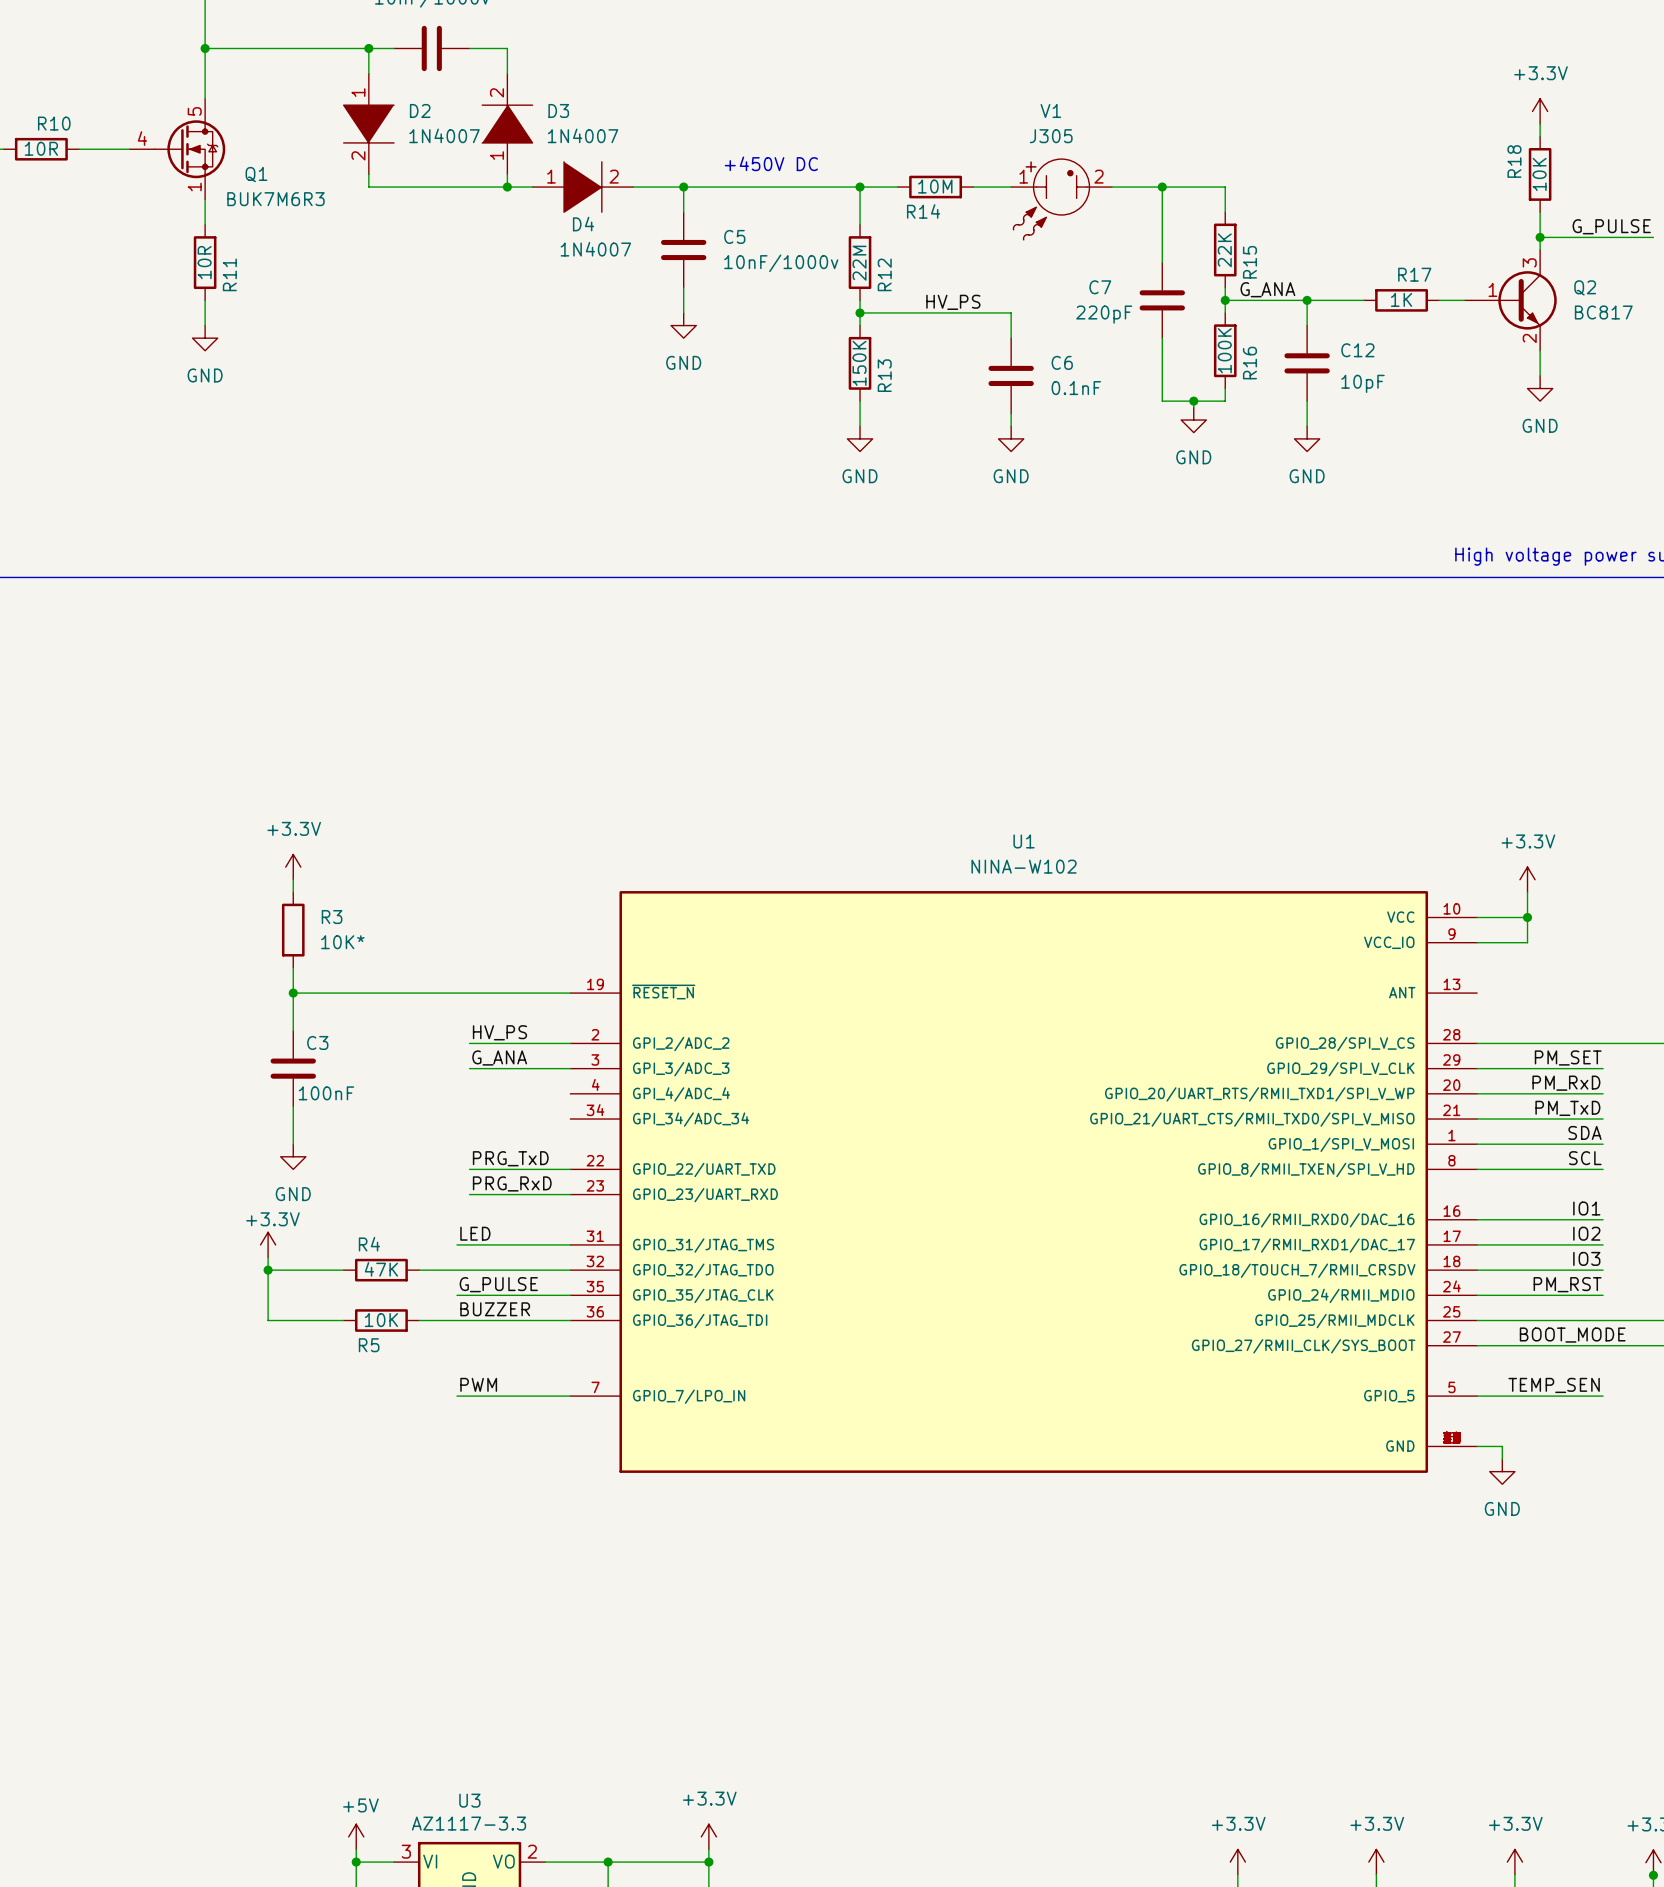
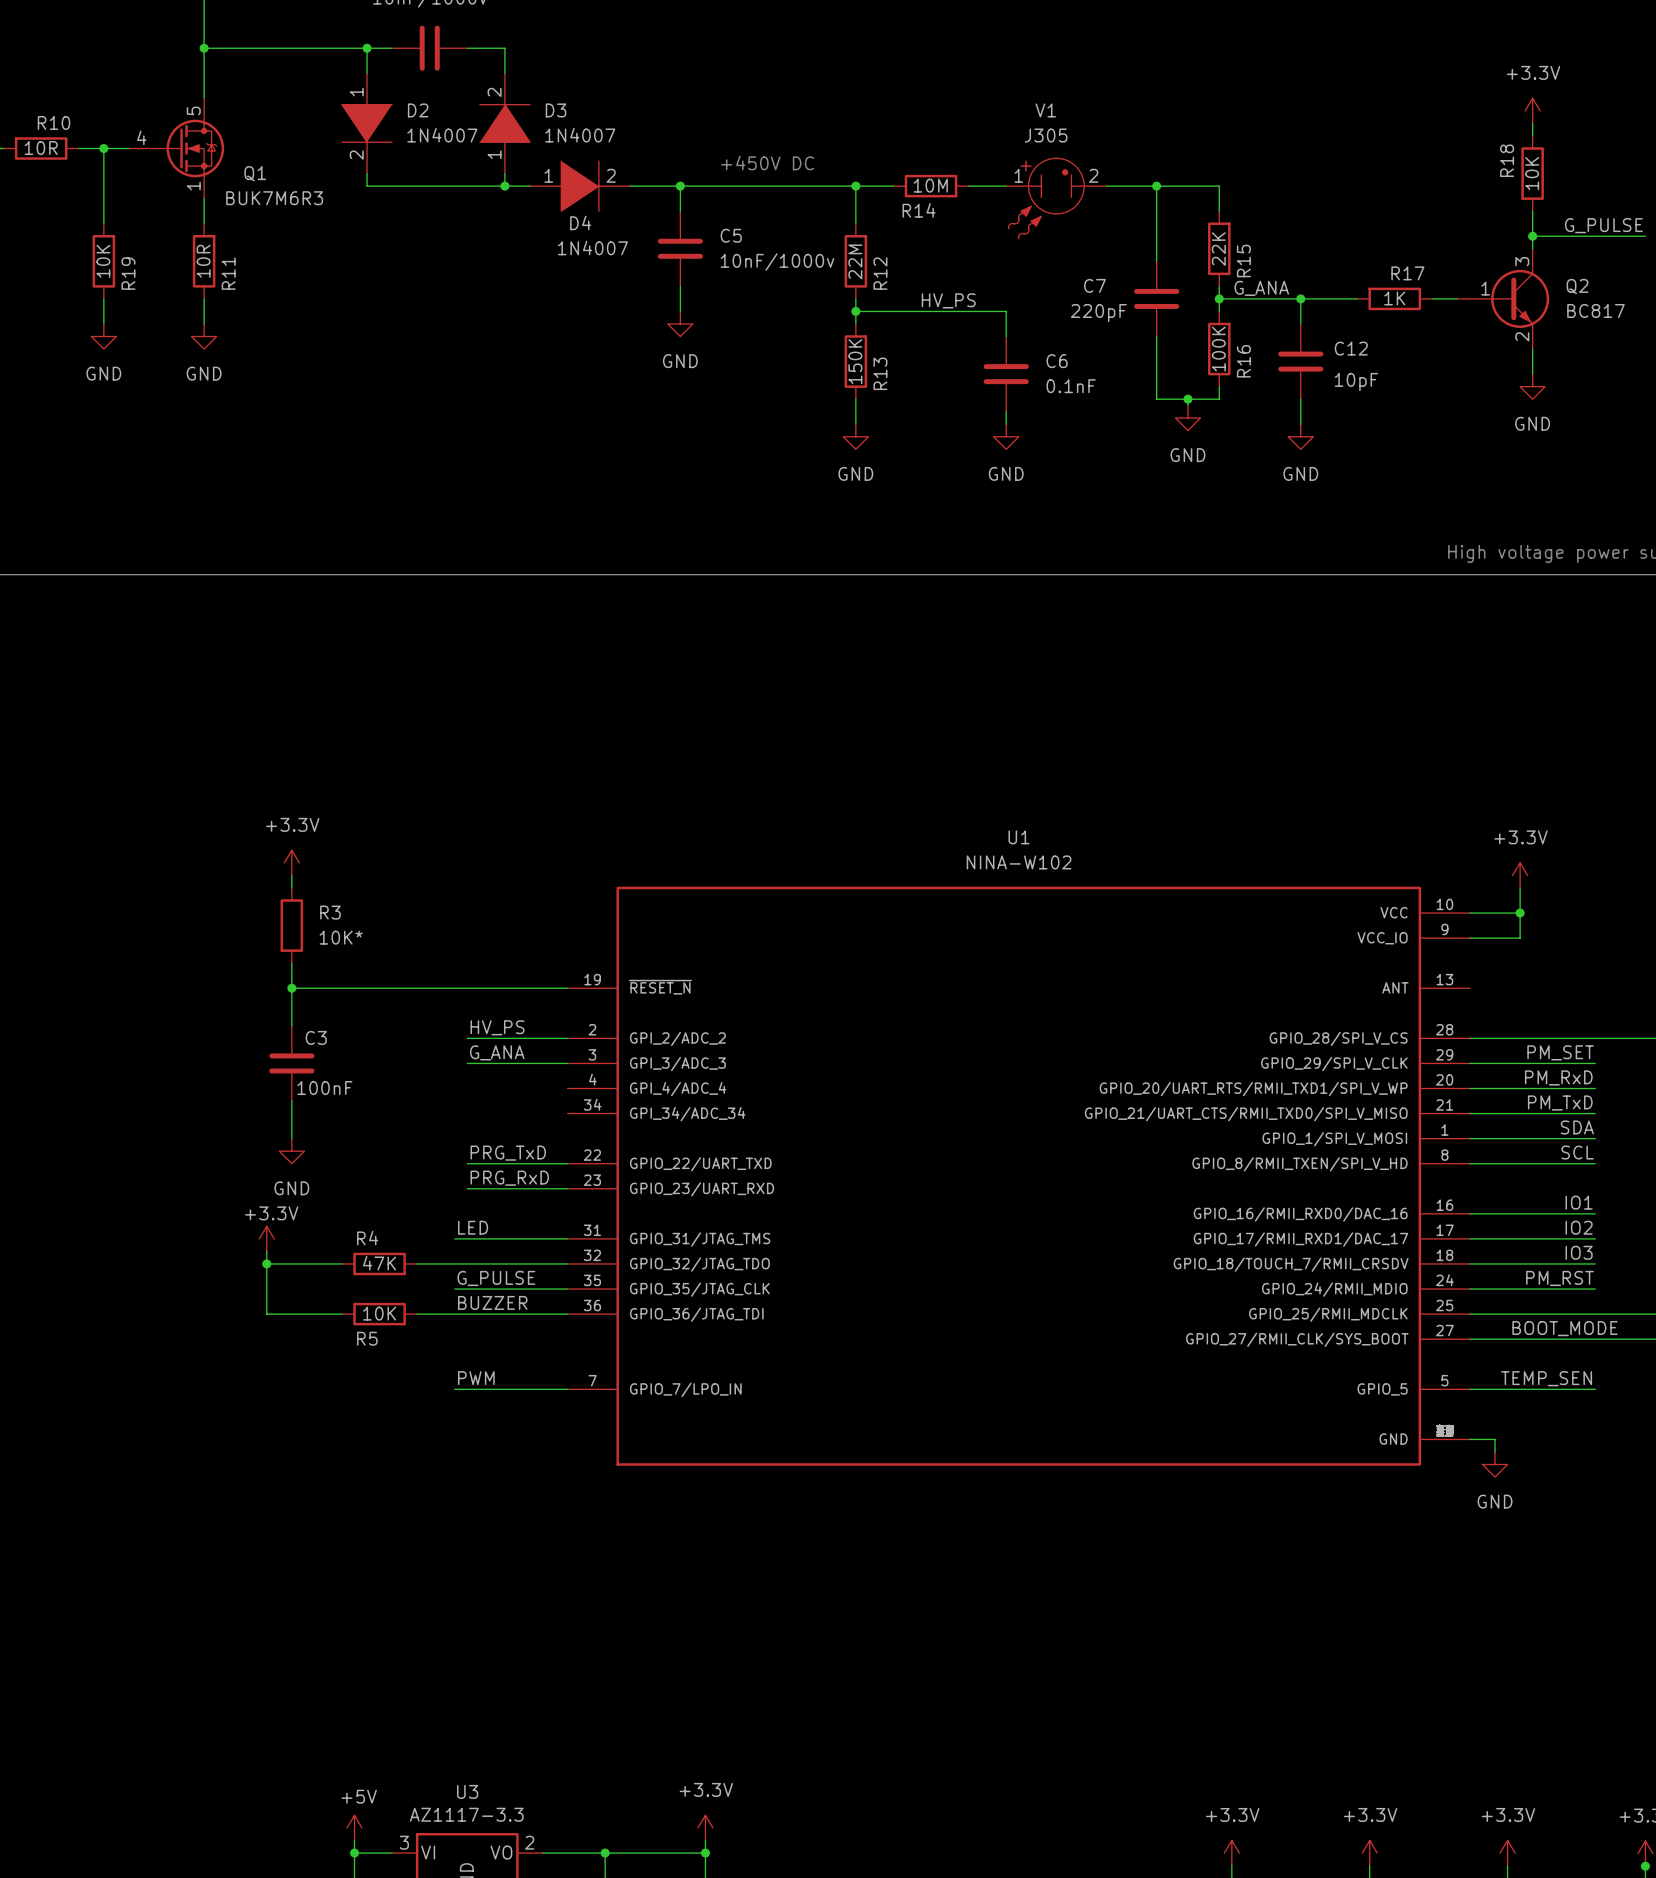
wire: none -> (103, 148) (103, 223)
junction: none -> (103, 148)
R19: none -> 10K (103, 261)
wire: none -> (103, 298) (103, 323)
power symbol: none -> GND (103, 336)

